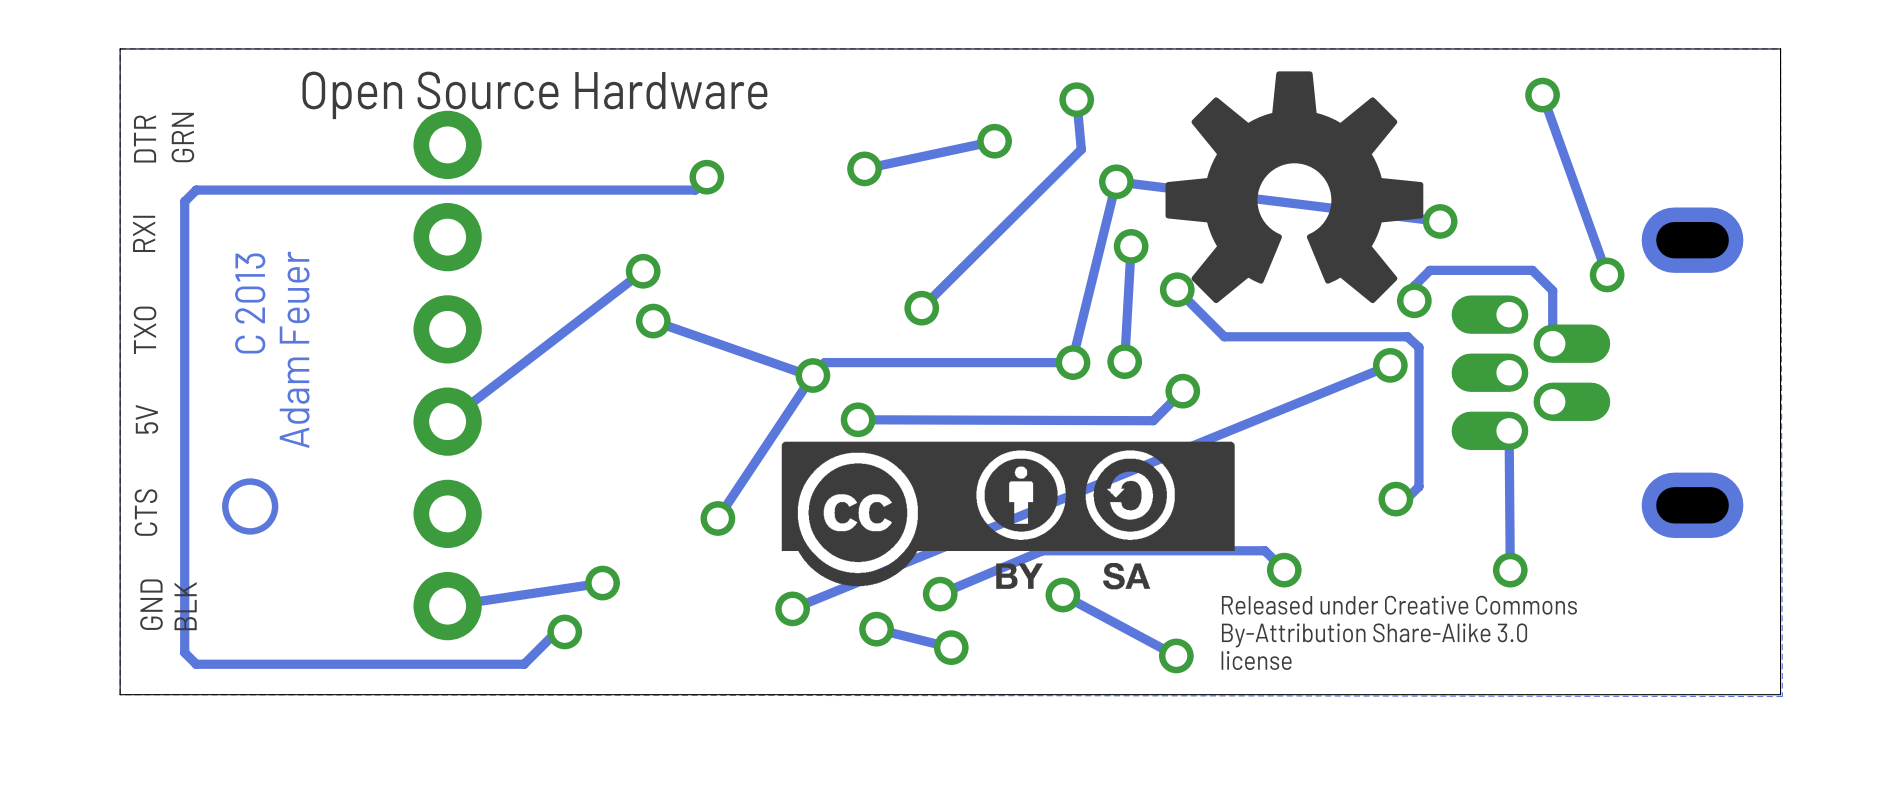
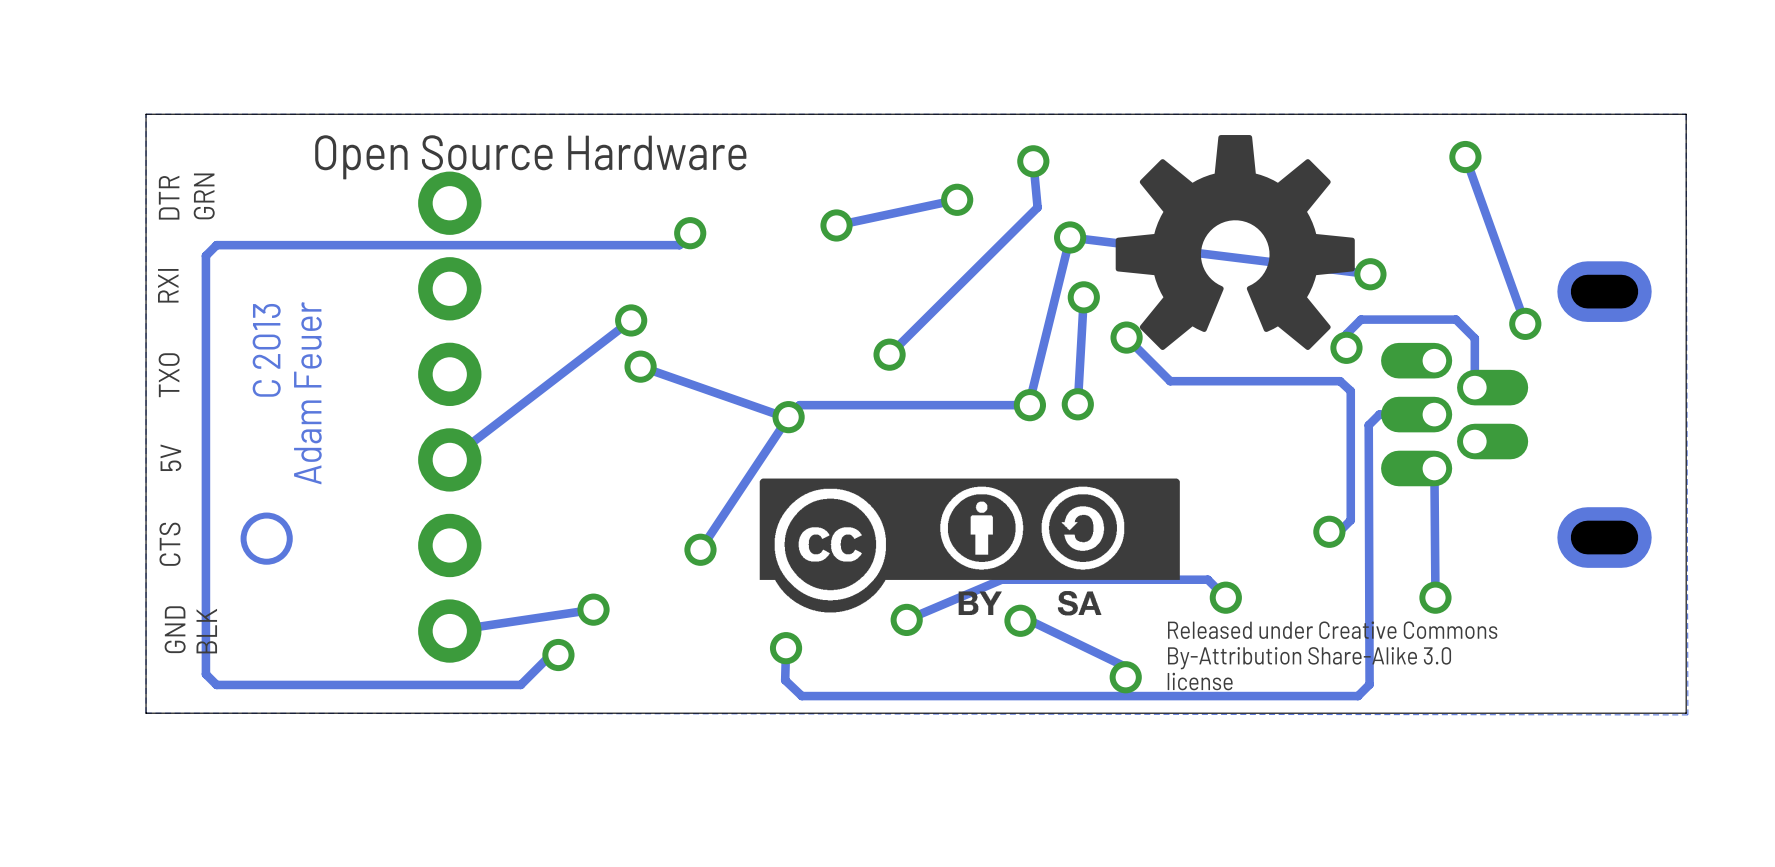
track: (1390, 365) (792, 608) -> none
via: (1390, 365) -> none
track: none -> (1434, 414) (1379, 414) (1368, 425) (1369, 684) (1358, 696) (801, 696) (785, 680) (786, 648)
track: (1182, 391) (1153, 420) (858, 419) -> none
via: (1182, 391) -> none
via: (858, 419) -> none
track: none -> (1021, 616) (1124, 666)
track: (1062, 595) (1176, 655) -> none
via position: (792, 608) -> (786, 648)
track: (876, 629) (951, 647) -> none
via: (876, 629) -> none
via: (951, 647) -> none

